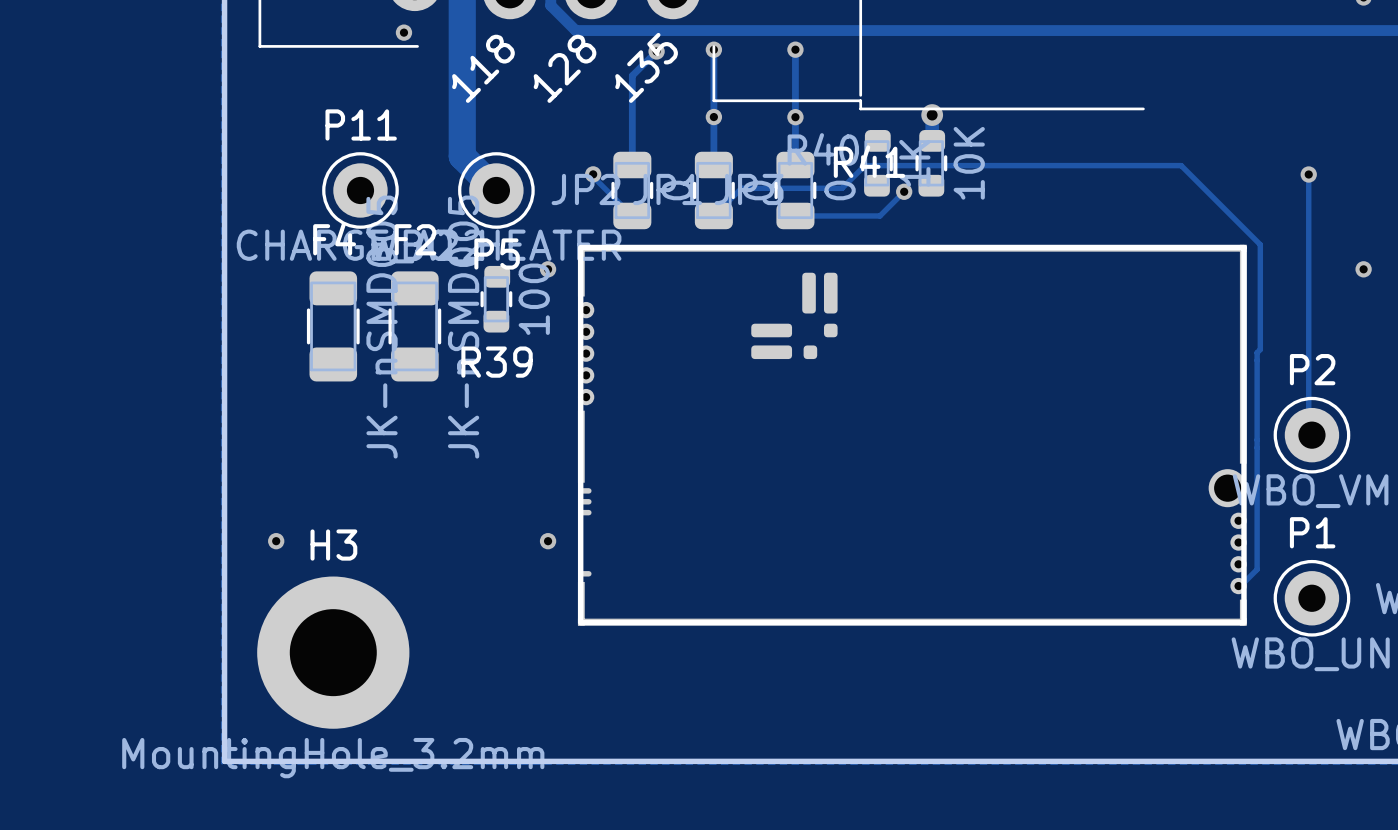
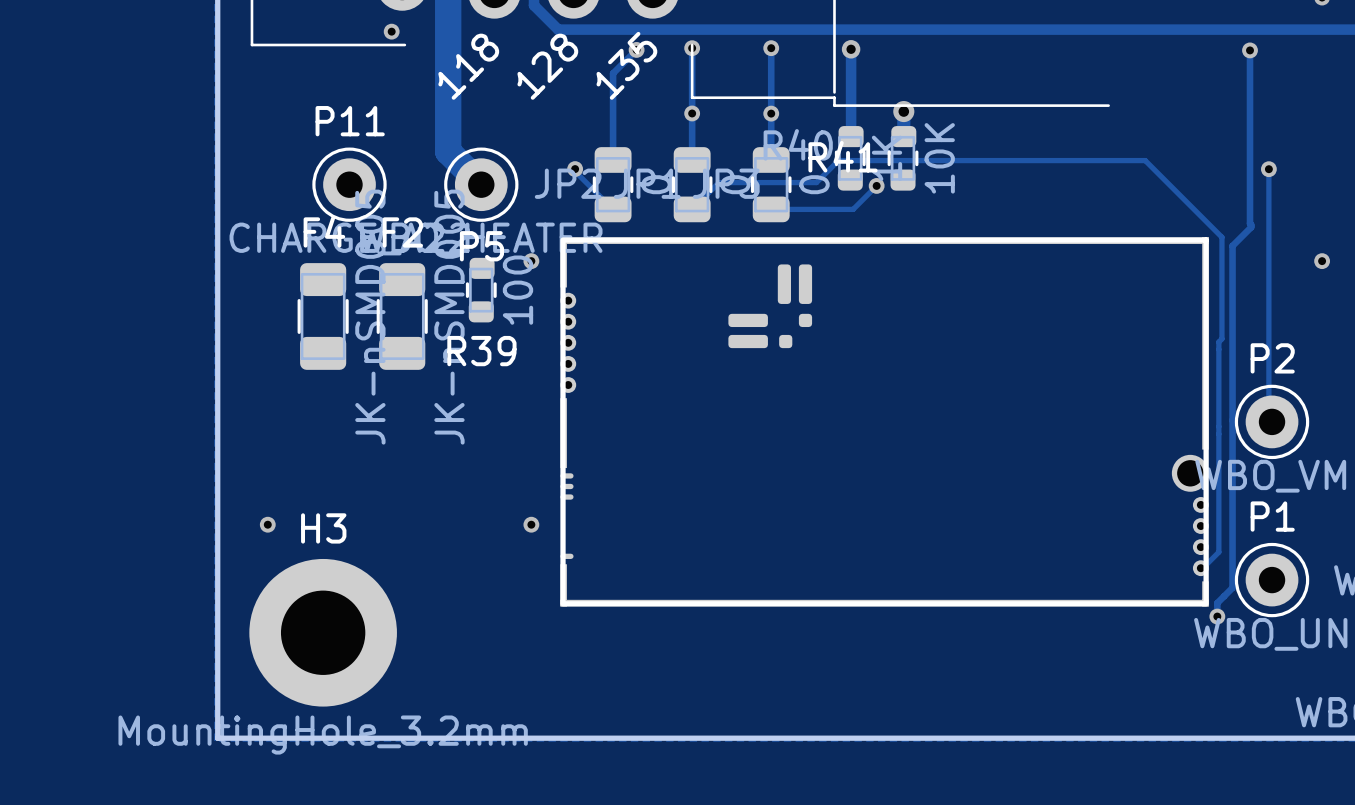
track: none -> (851, 49) (851, 136)
via: none -> (851, 49)
track: none -> (1250, 50) (1251, 227) (1232, 245) (1232, 587) (1217, 603) (1217, 616)
via: none -> (1250, 50)
via: none -> (1217, 616)

